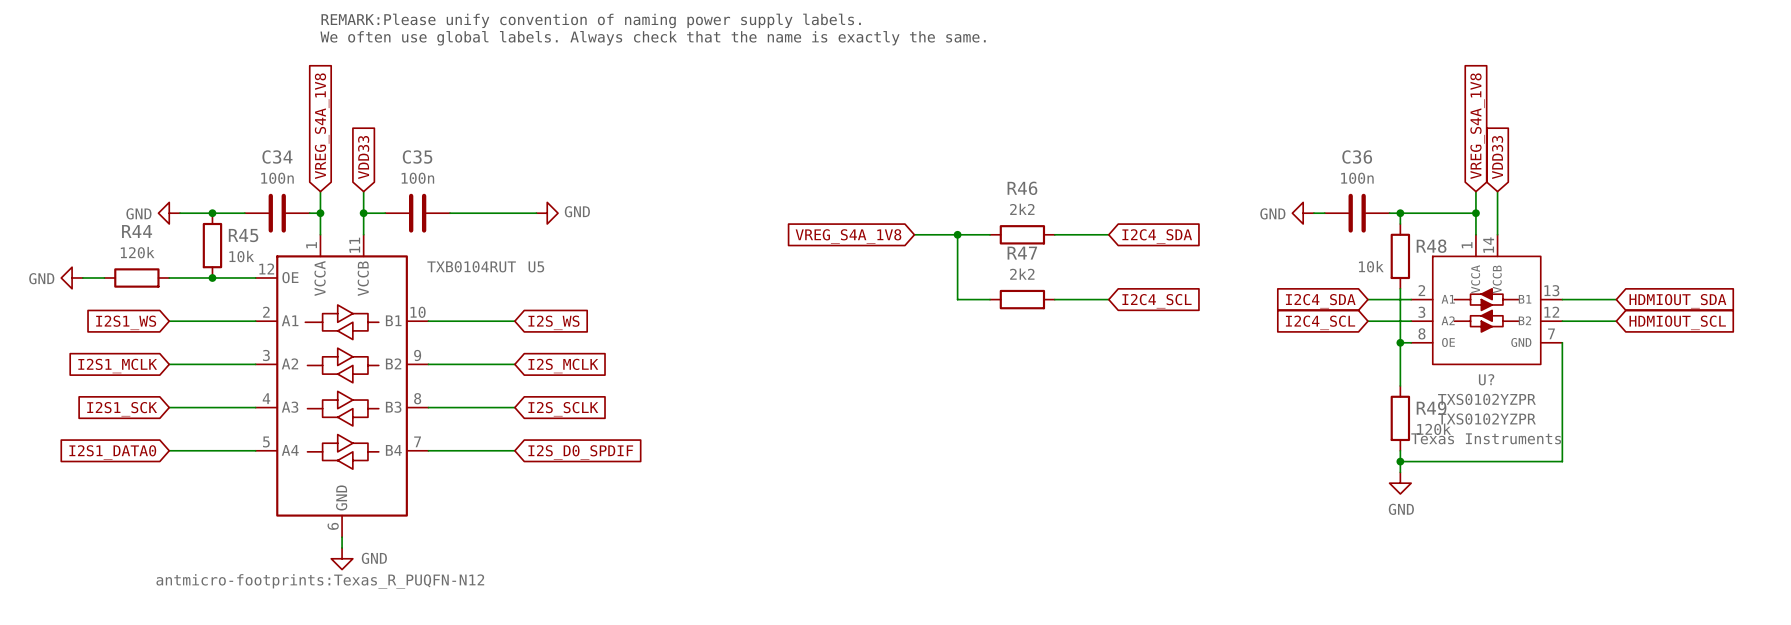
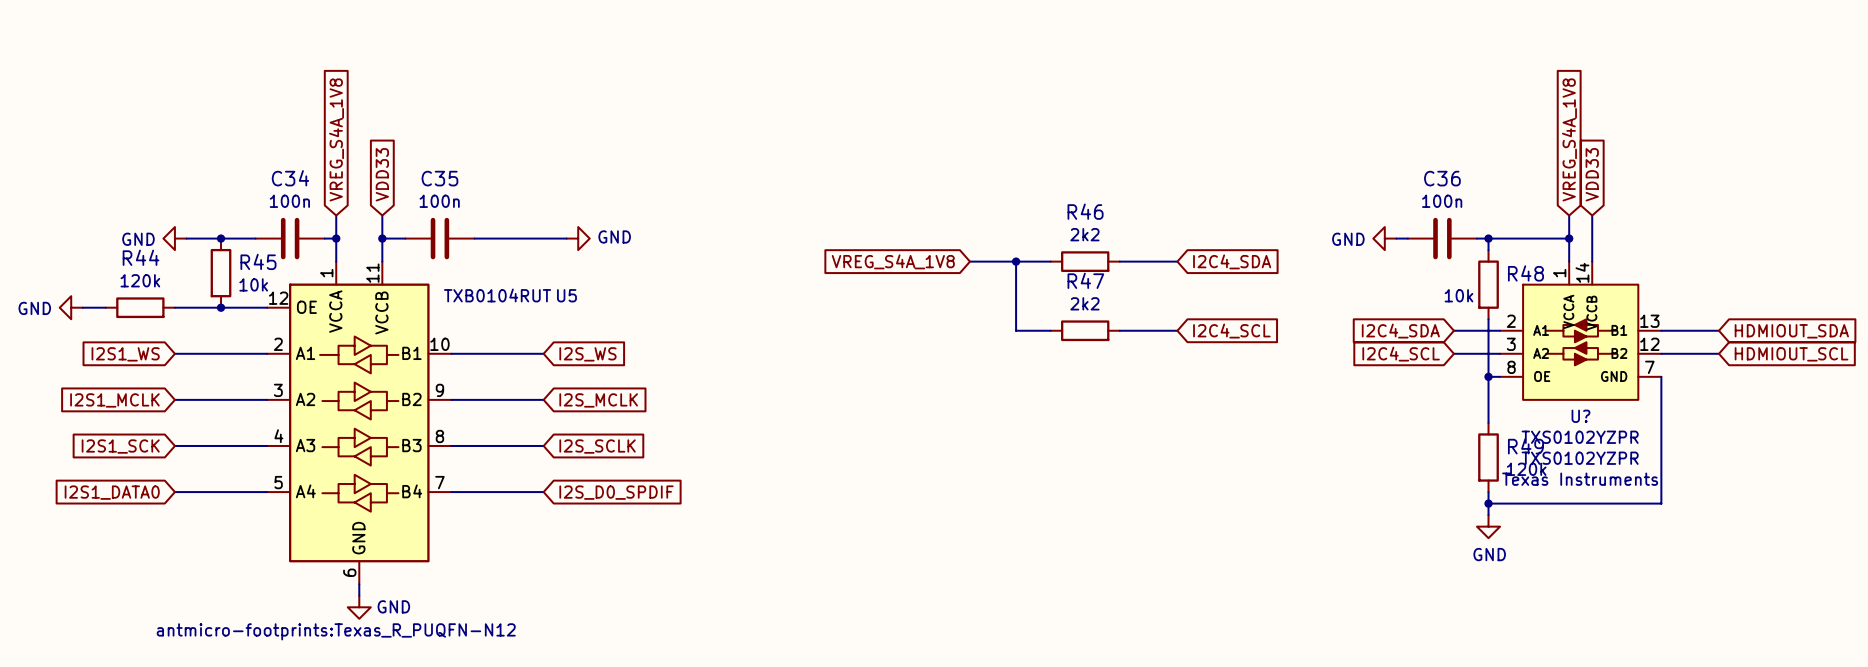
text: REMARK:Please unify convention of naming power supply labels. (591, 20) -> none
text: We often use global labels. Always check that the name is exactly the same. (653, 38) -> none

